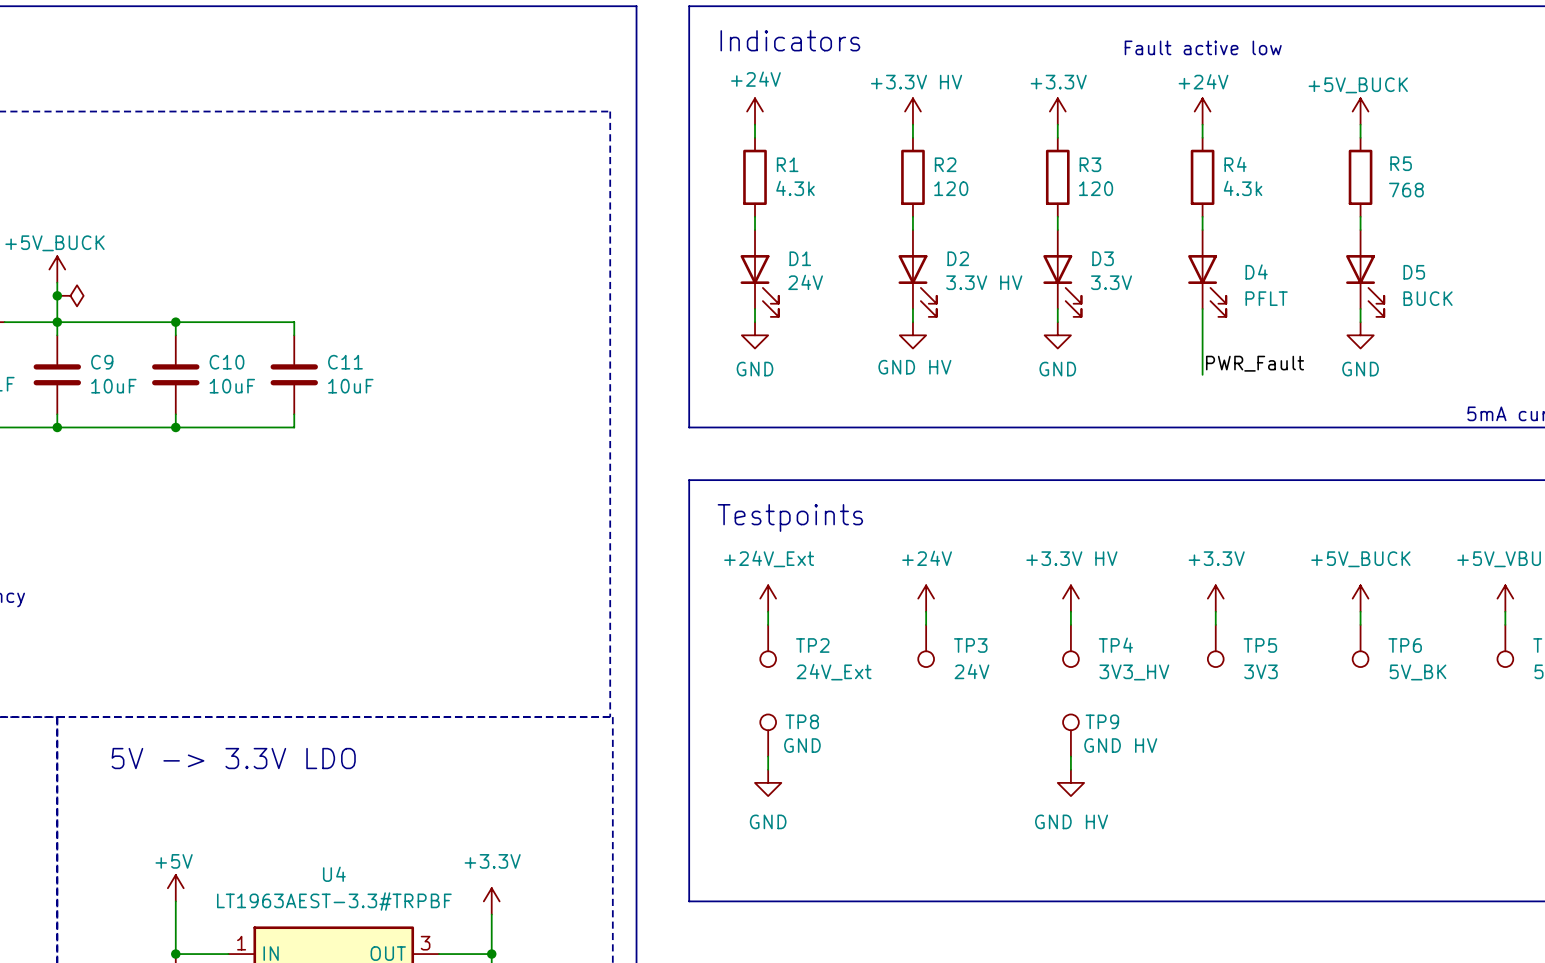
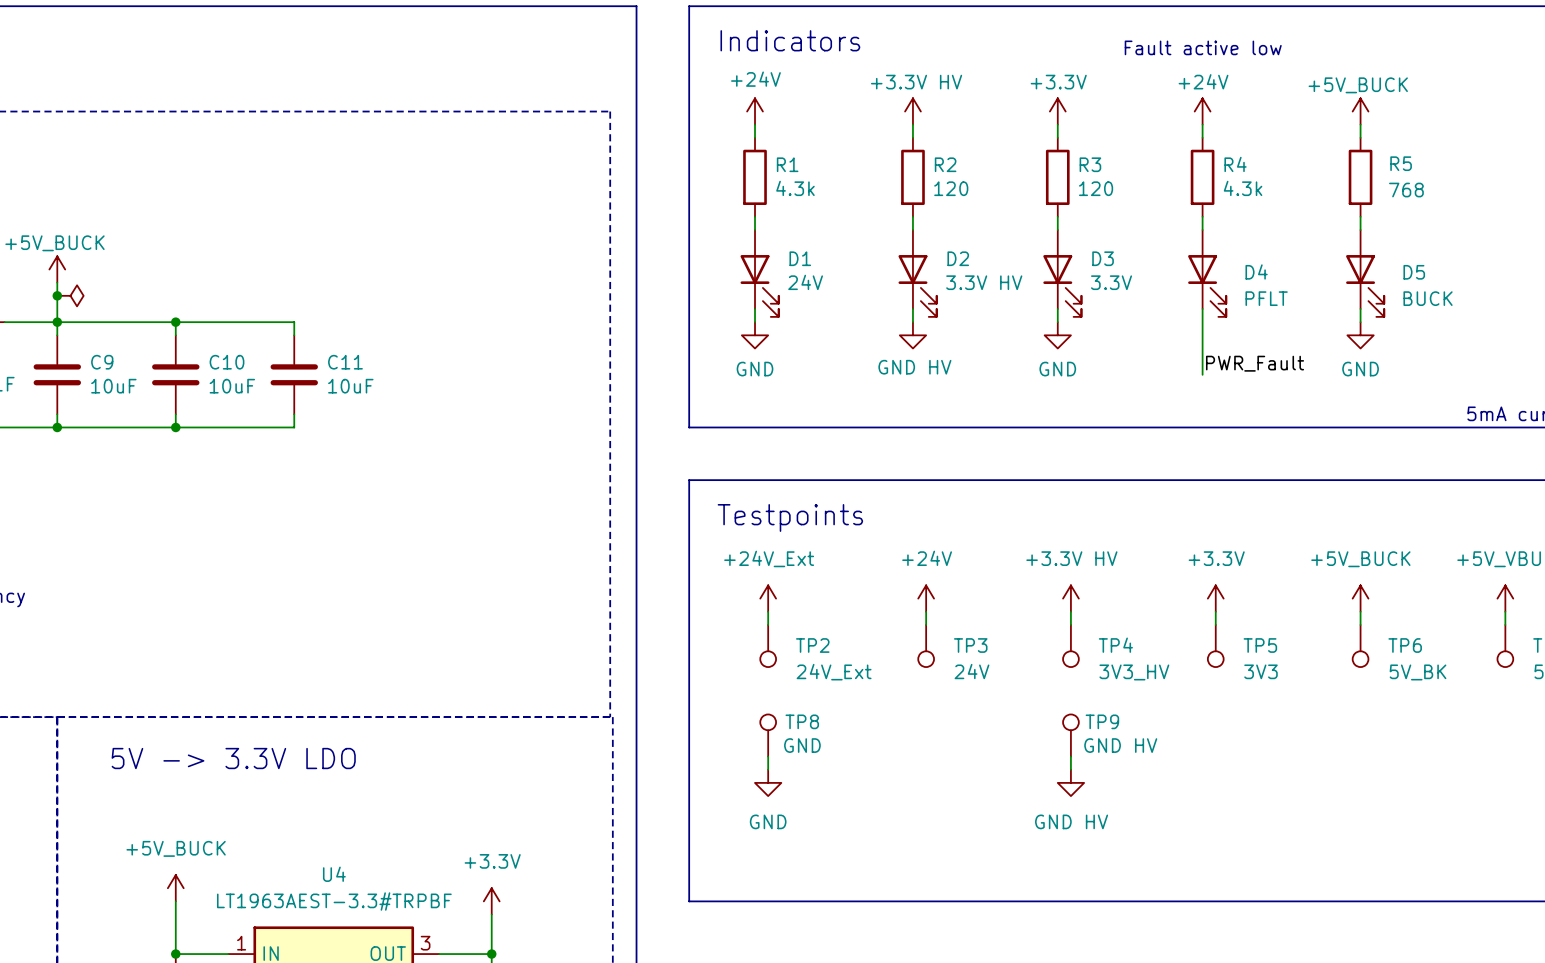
power symbol: +5V (175, 888) -> +5V_BUCK (175, 888)

